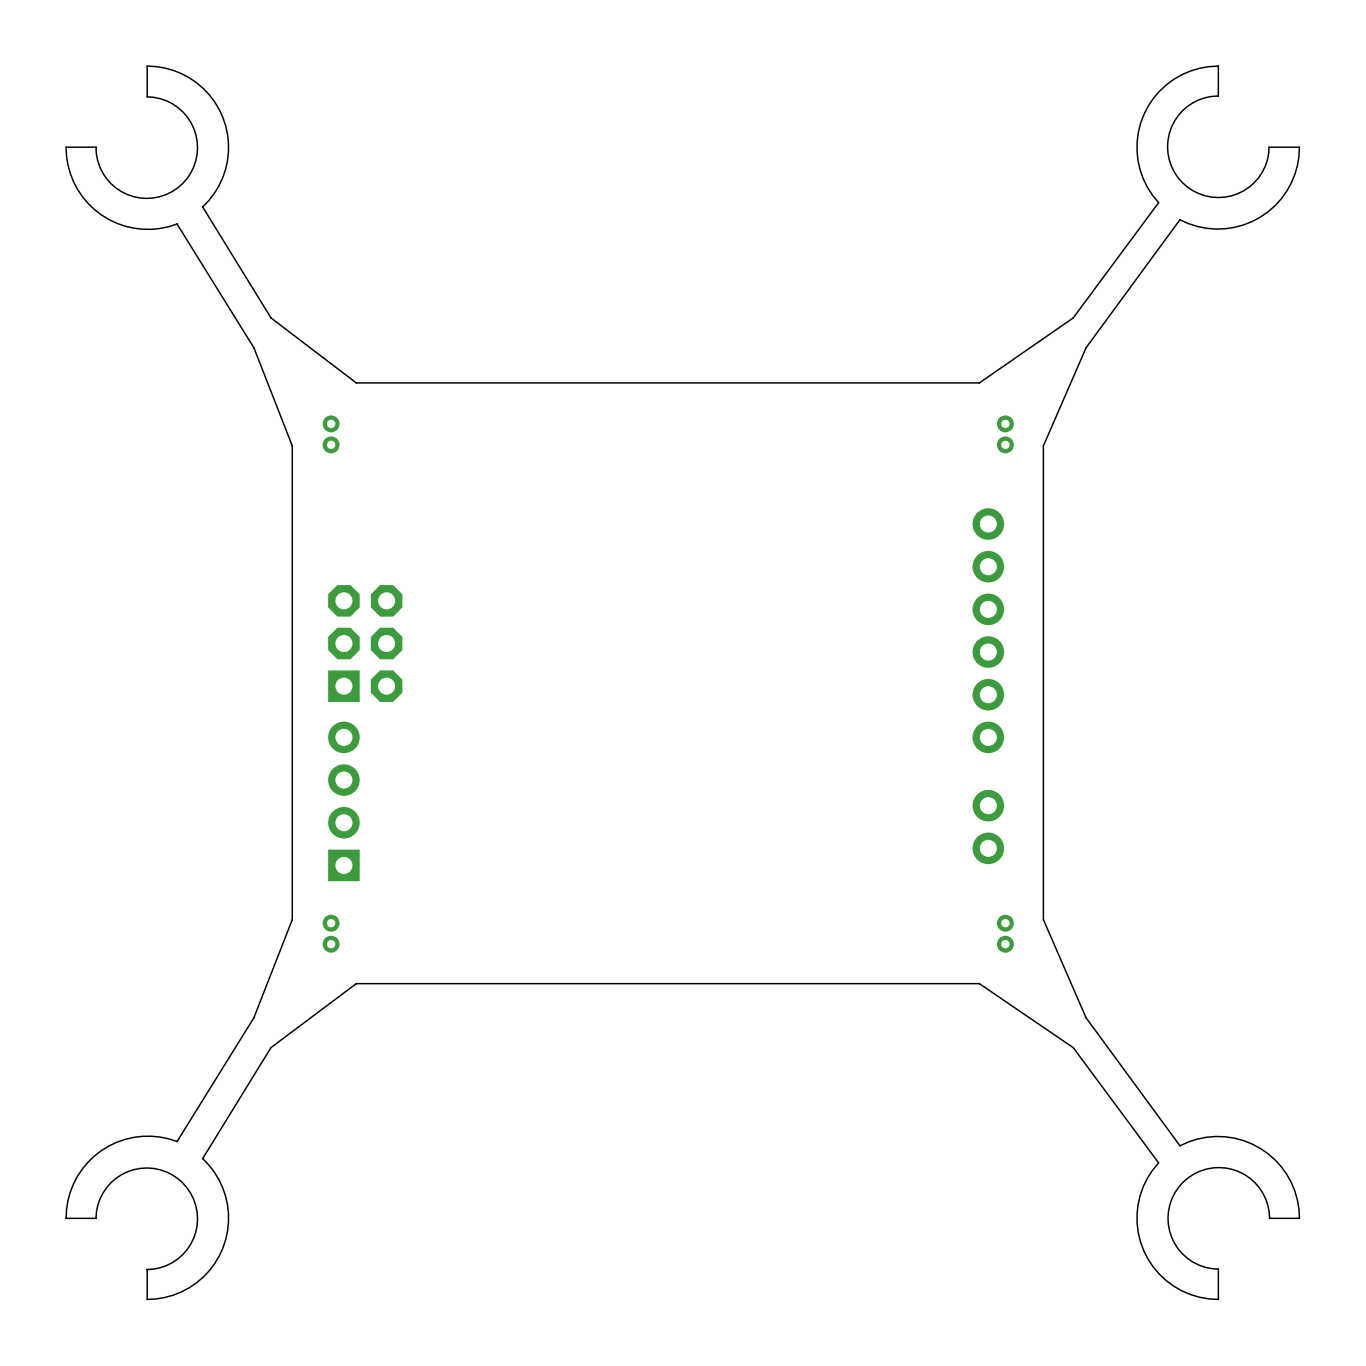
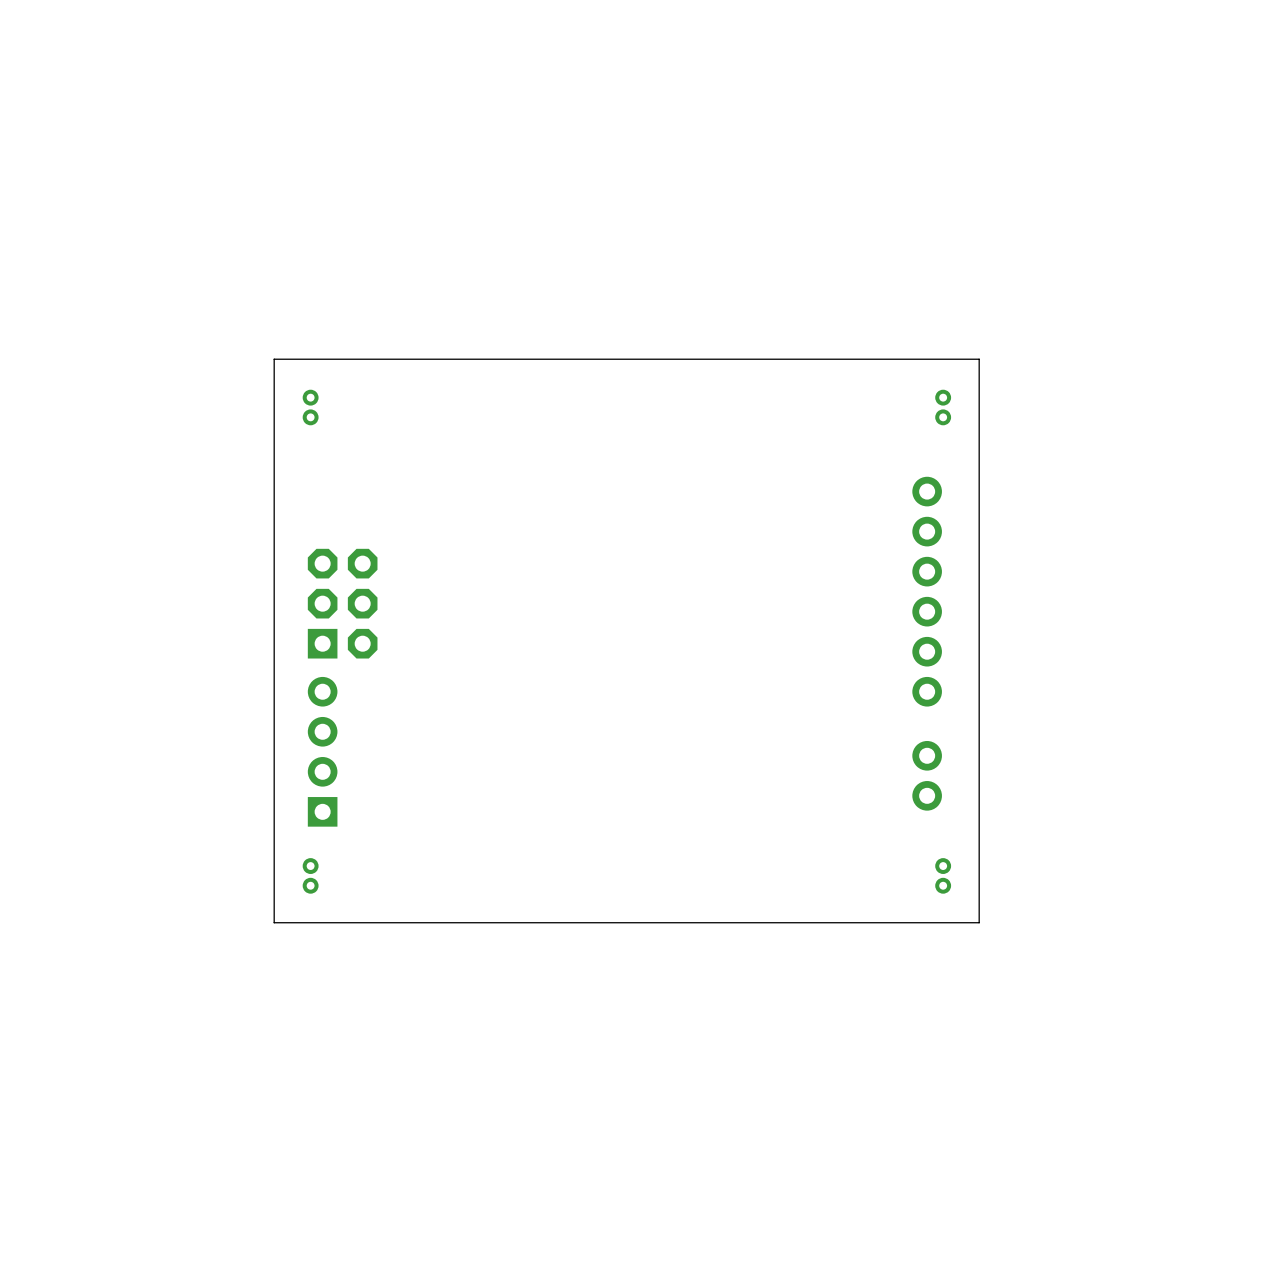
board edge: (356, 382) (270, 317) (202, 206) (214, 193) (222, 178) (228, 152) (225, 126) (214, 101) (196, 82) (181, 73) (164, 68) (147, 66) (147, 96) (160, 98) (177, 107) (187, 116) (193, 128) (197, 141) (197, 154) (193, 167) (186, 178) (177, 188) (159, 196) (146, 198) (127, 194) (115, 187) (102, 172) (97, 160) (95, 147) (66, 147) (70, 173) (82, 196) (94, 209) (108, 219) (125, 226) (142, 229) (160, 228) (177, 224) (253, 347) (292, 445) -> (334, 359) (274, 359) (274, 418)
board edge: (979, 382) (1073, 317) (1158, 202) (1143, 179) (1138, 160) (1137, 142) (1140, 123) (1148, 106) (1159, 91) (1173, 79) (1199, 68) (1218, 66) (1218, 95) (1205, 97) (1187, 106) (1178, 115) (1169, 133) (1167, 146) (1171, 166) (1182, 182) (1192, 190) (1204, 195) (1218, 197) (1237, 193) (1248, 187) (1258, 177) (1267, 160) (1269, 147) (1299, 147) (1297, 165) (1291, 183) (1274, 205) (1260, 217) (1243, 225) (1225, 228) (1206, 228) (1179, 219) (1086, 347) (1043, 445) (1043, 919) (1086, 1017) (1179, 1145) (1206, 1137) (1225, 1136) (1243, 1140) (1260, 1148) (1274, 1159) (1291, 1182) (1297, 1199) (1299, 1218) (1269, 1218) (1267, 1205) (1259, 1187) (1249, 1178) (1238, 1171) (1218, 1167) (1205, 1169) (1193, 1174) (1183, 1182) (1171, 1198) (1167, 1218) (1169, 1231) (1178, 1248) (1187, 1258) (1205, 1267) (1218, 1269) (1218, 1299) (1199, 1297) (1173, 1286) (1159, 1274) (1148, 1259) (1140, 1241) (1137, 1223) (1138, 1204) (1143, 1186) (1158, 1162) (1073, 1047) (979, 983) -> (918, 359) (979, 359) (979, 922) (918, 922)
board edge: (292, 919) (253, 1017) (177, 1141) (160, 1137) (142, 1136) (116, 1142) (101, 1150) (88, 1162) (73, 1184) (67, 1200) (66, 1218) (95, 1218) (97, 1205) (106, 1187) (116, 1178) (133, 1169) (147, 1167) (160, 1169) (172, 1174) (187, 1188) (193, 1199) (197, 1212) (197, 1225) (193, 1238) (187, 1249) (177, 1259) (159, 1267) (146, 1269) -> (274, 862) (274, 922) (334, 922)
board edge: (356, 983) (270, 1047) (202, 1158) (214, 1171) (222, 1187) (228, 1213) (225, 1239) (214, 1263) (203, 1277) (189, 1287) (173, 1295) (156, 1298) (147, 1299) (147, 1269) -> none

